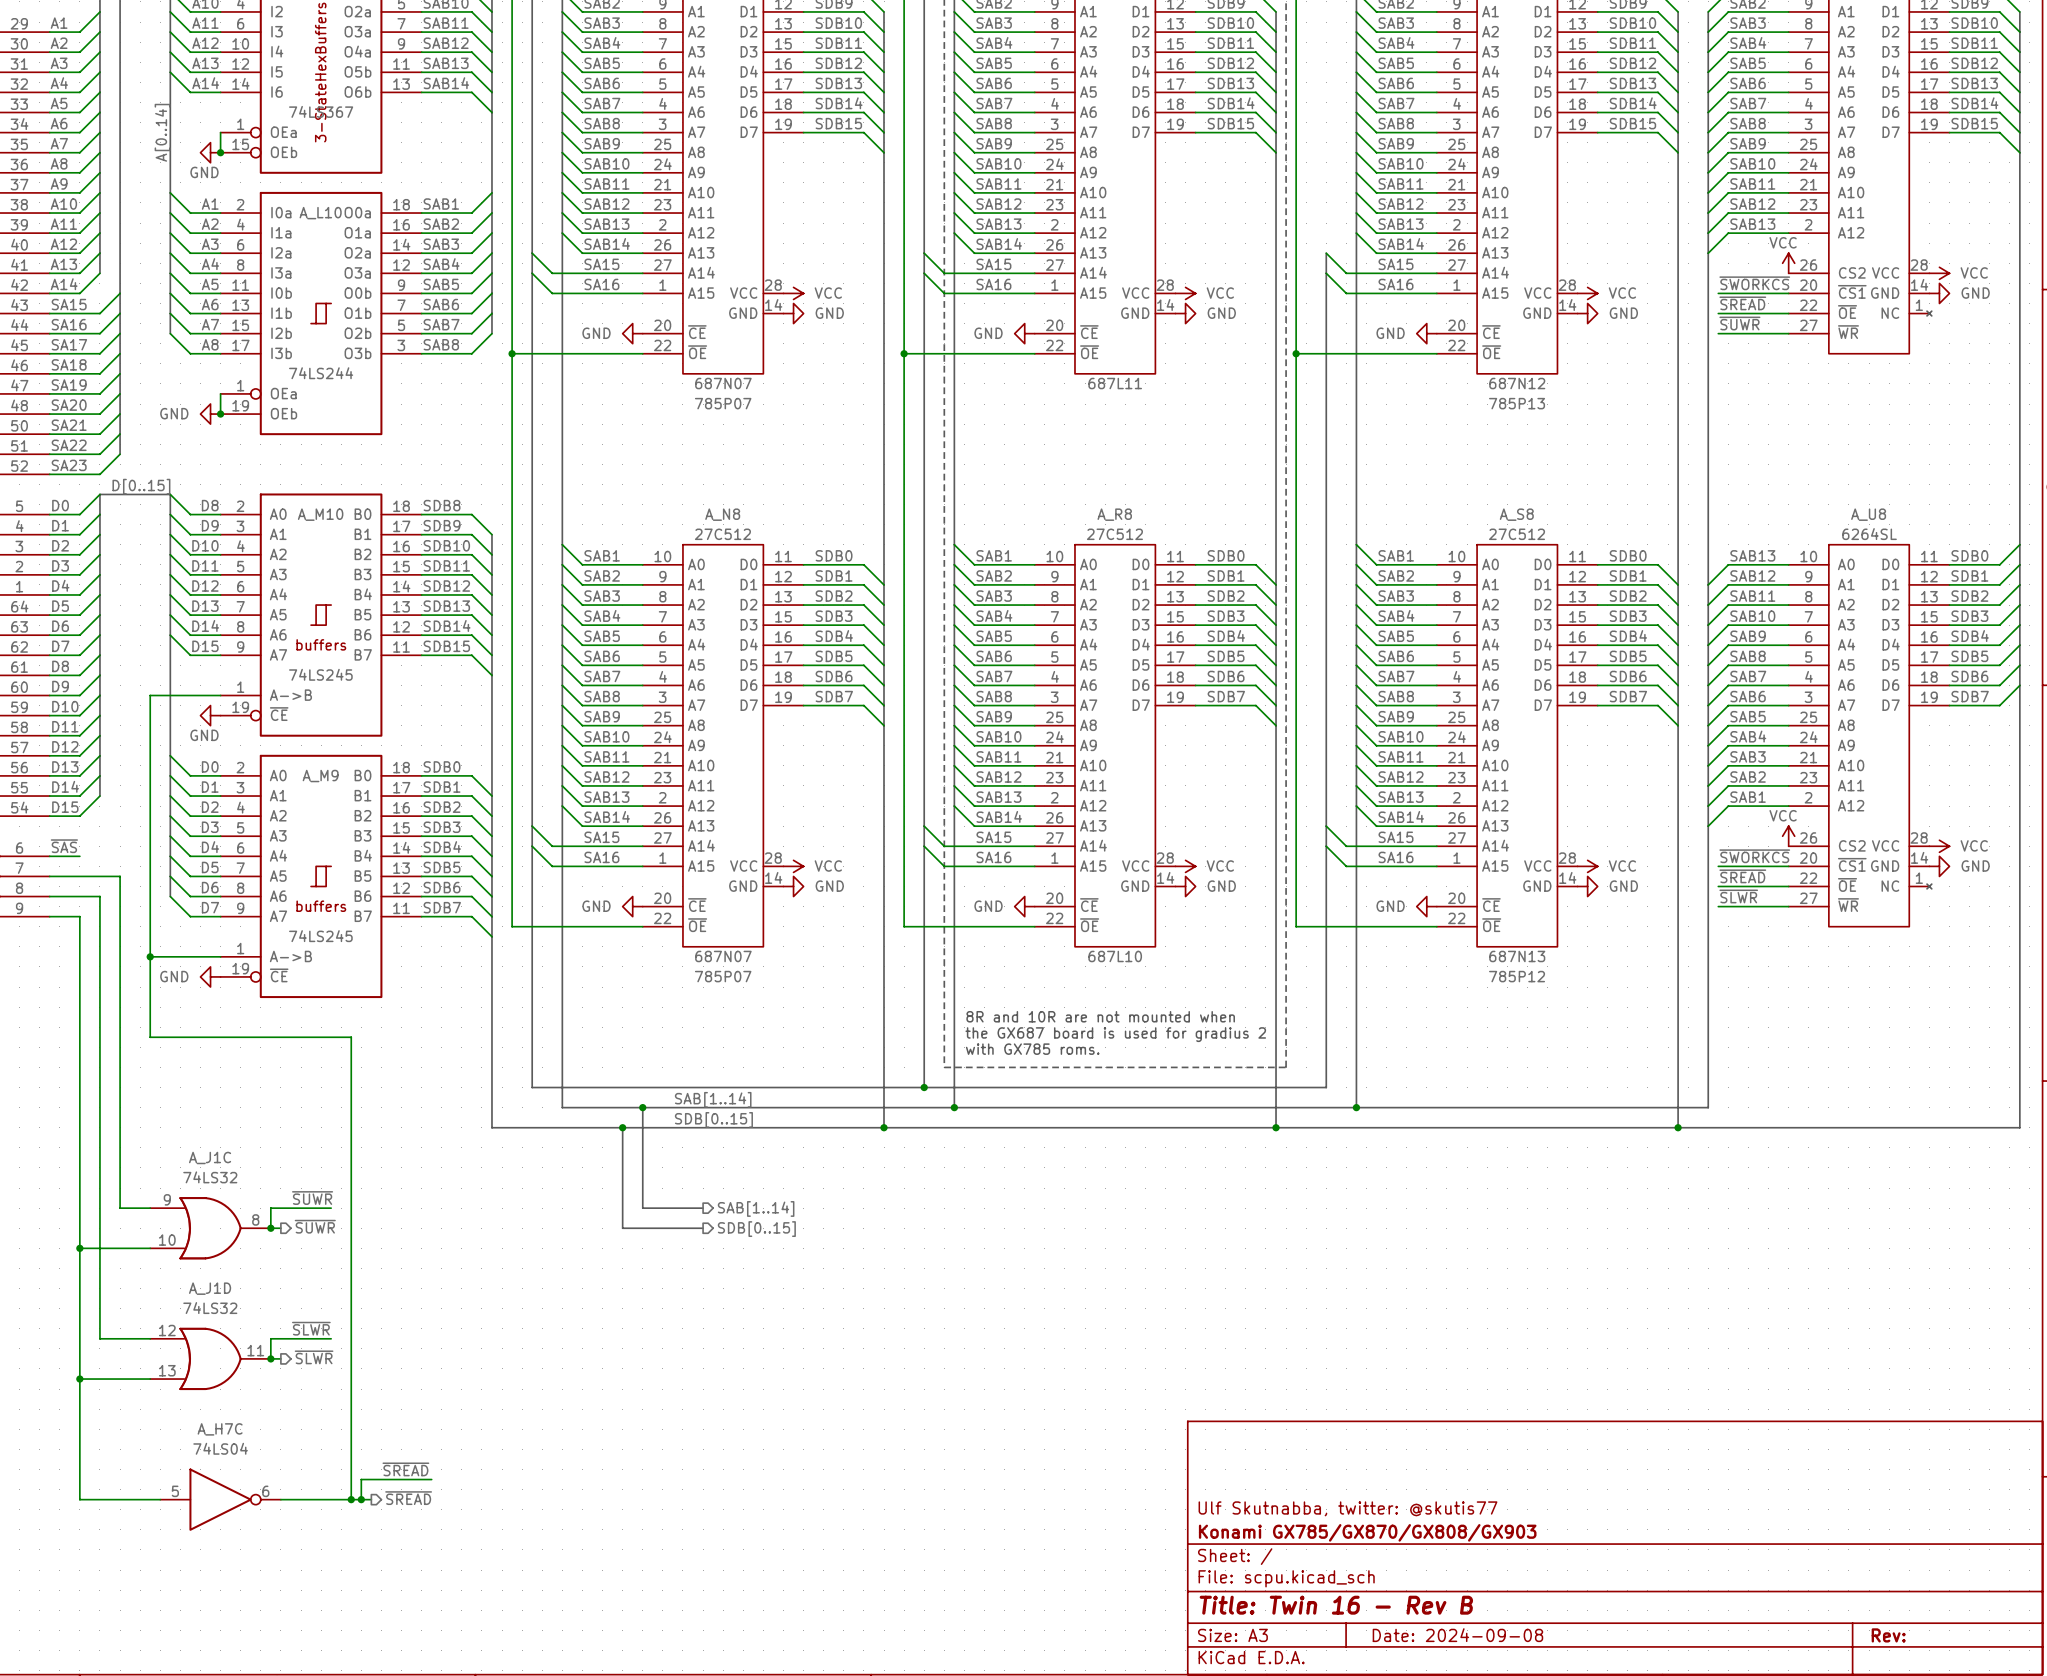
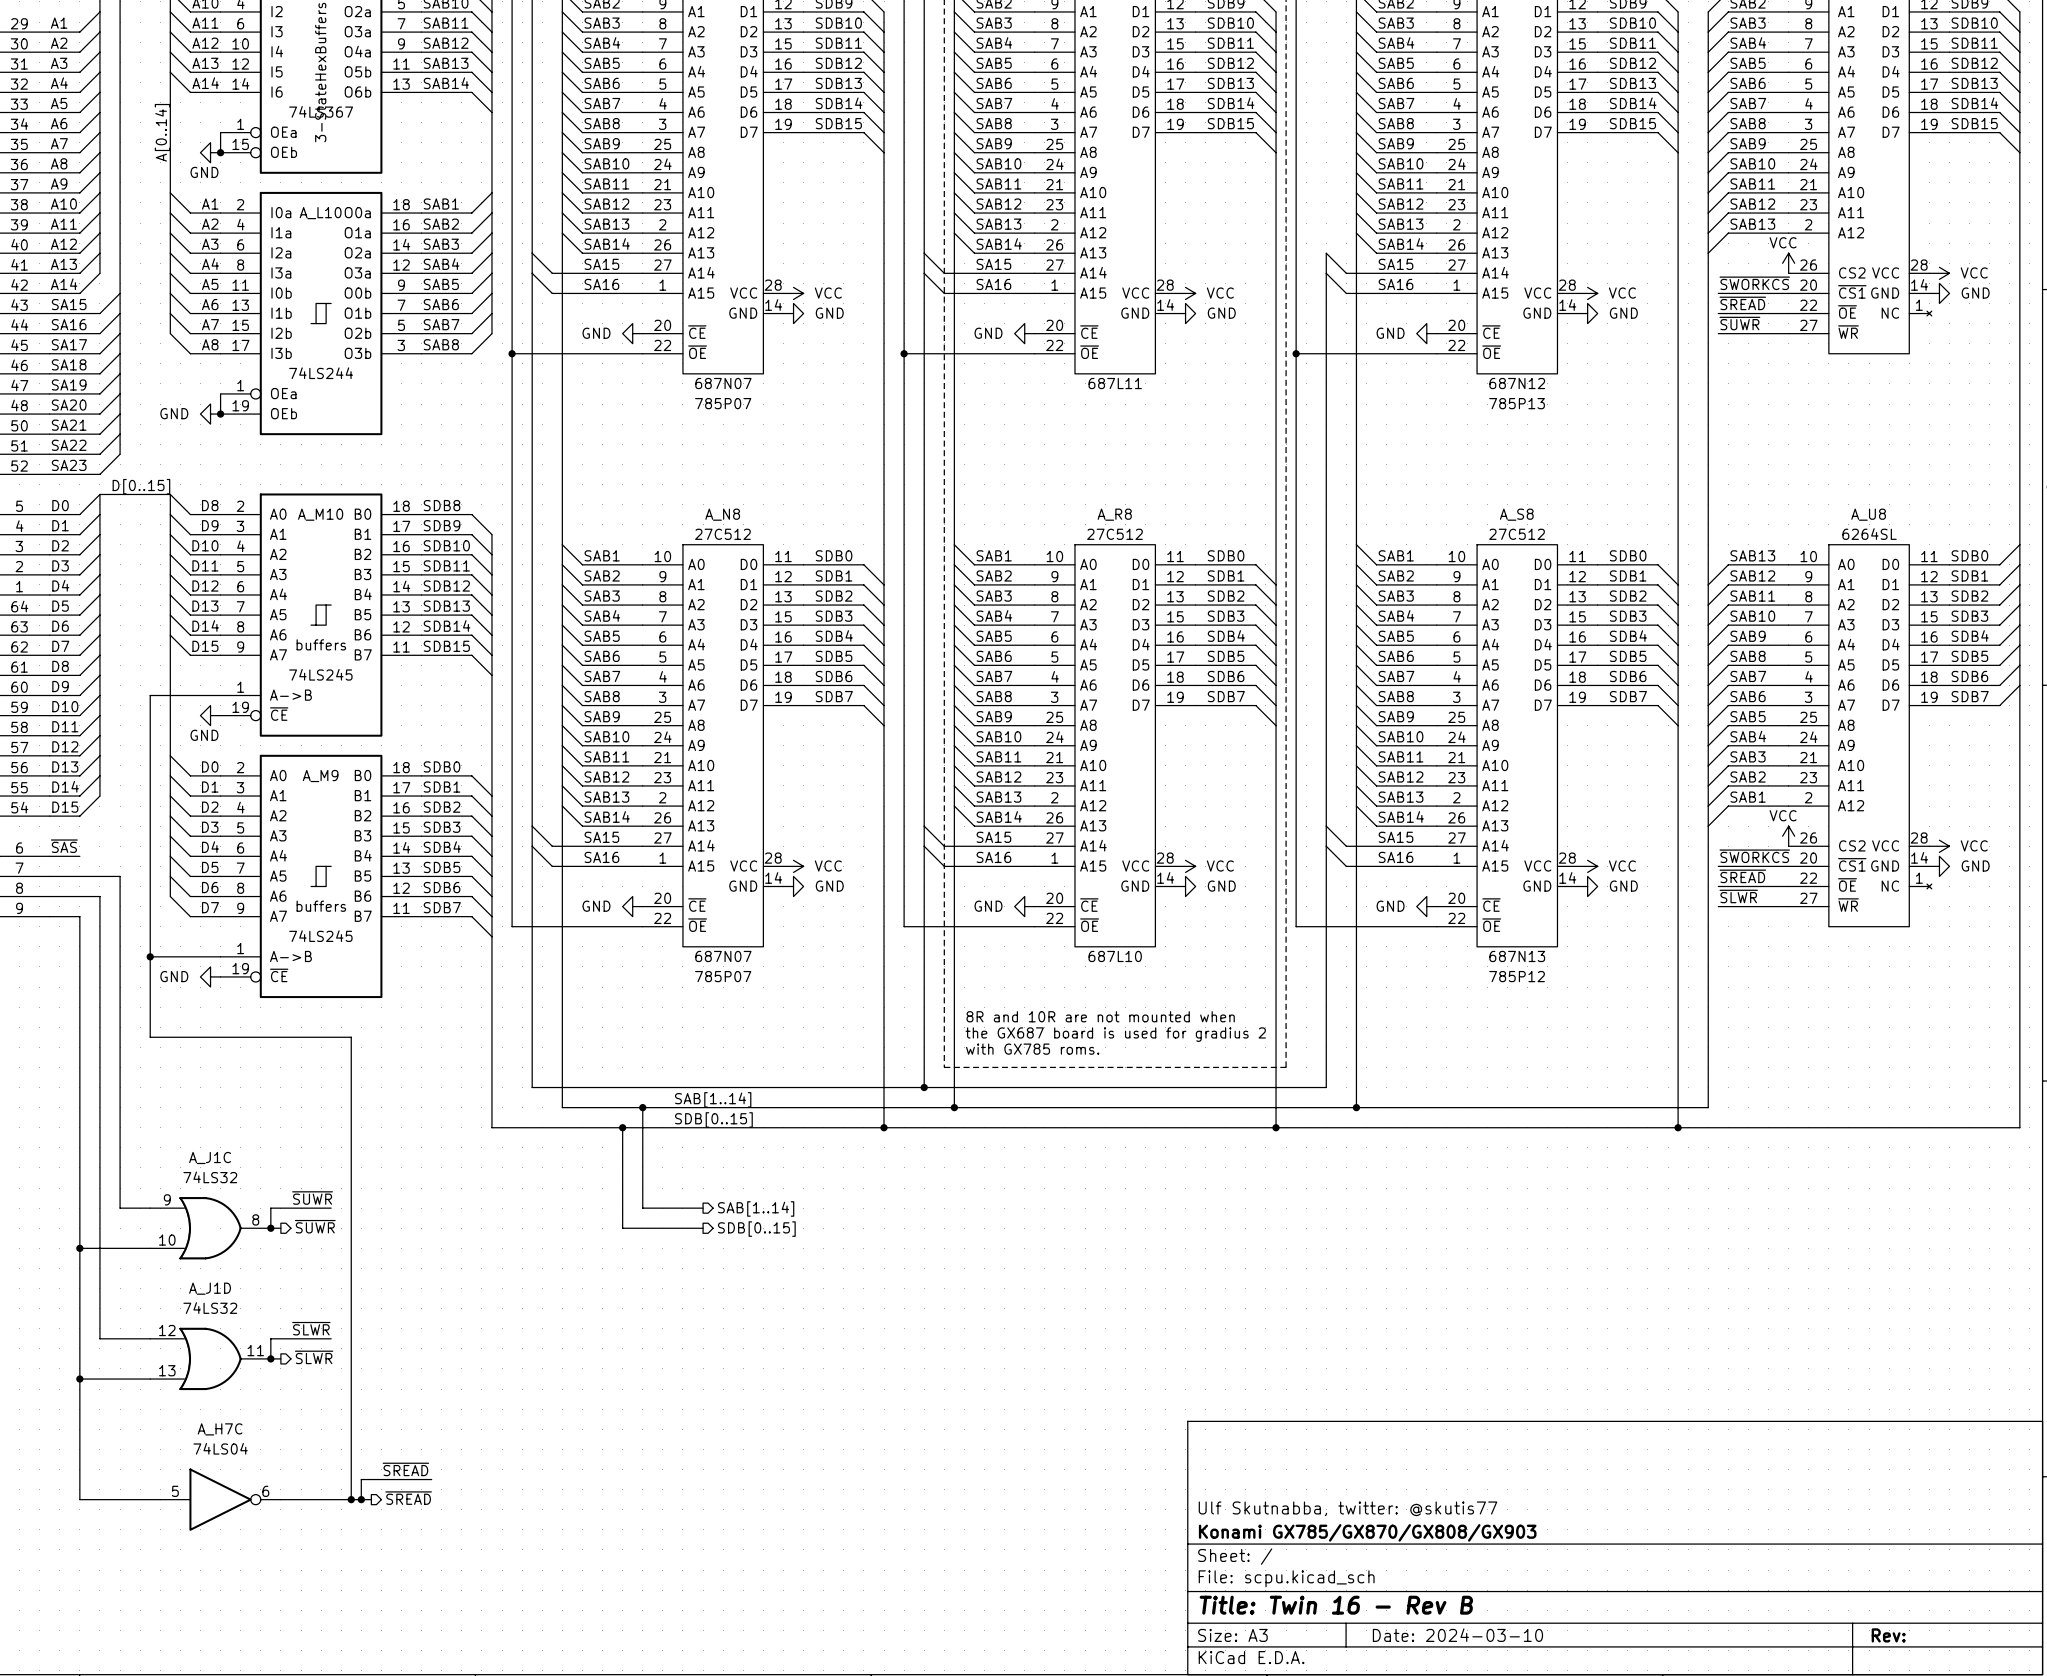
title block: Date: 2024-09-08 (1457, 1635) -> Date: 2024-03-10 (1457, 1635)

